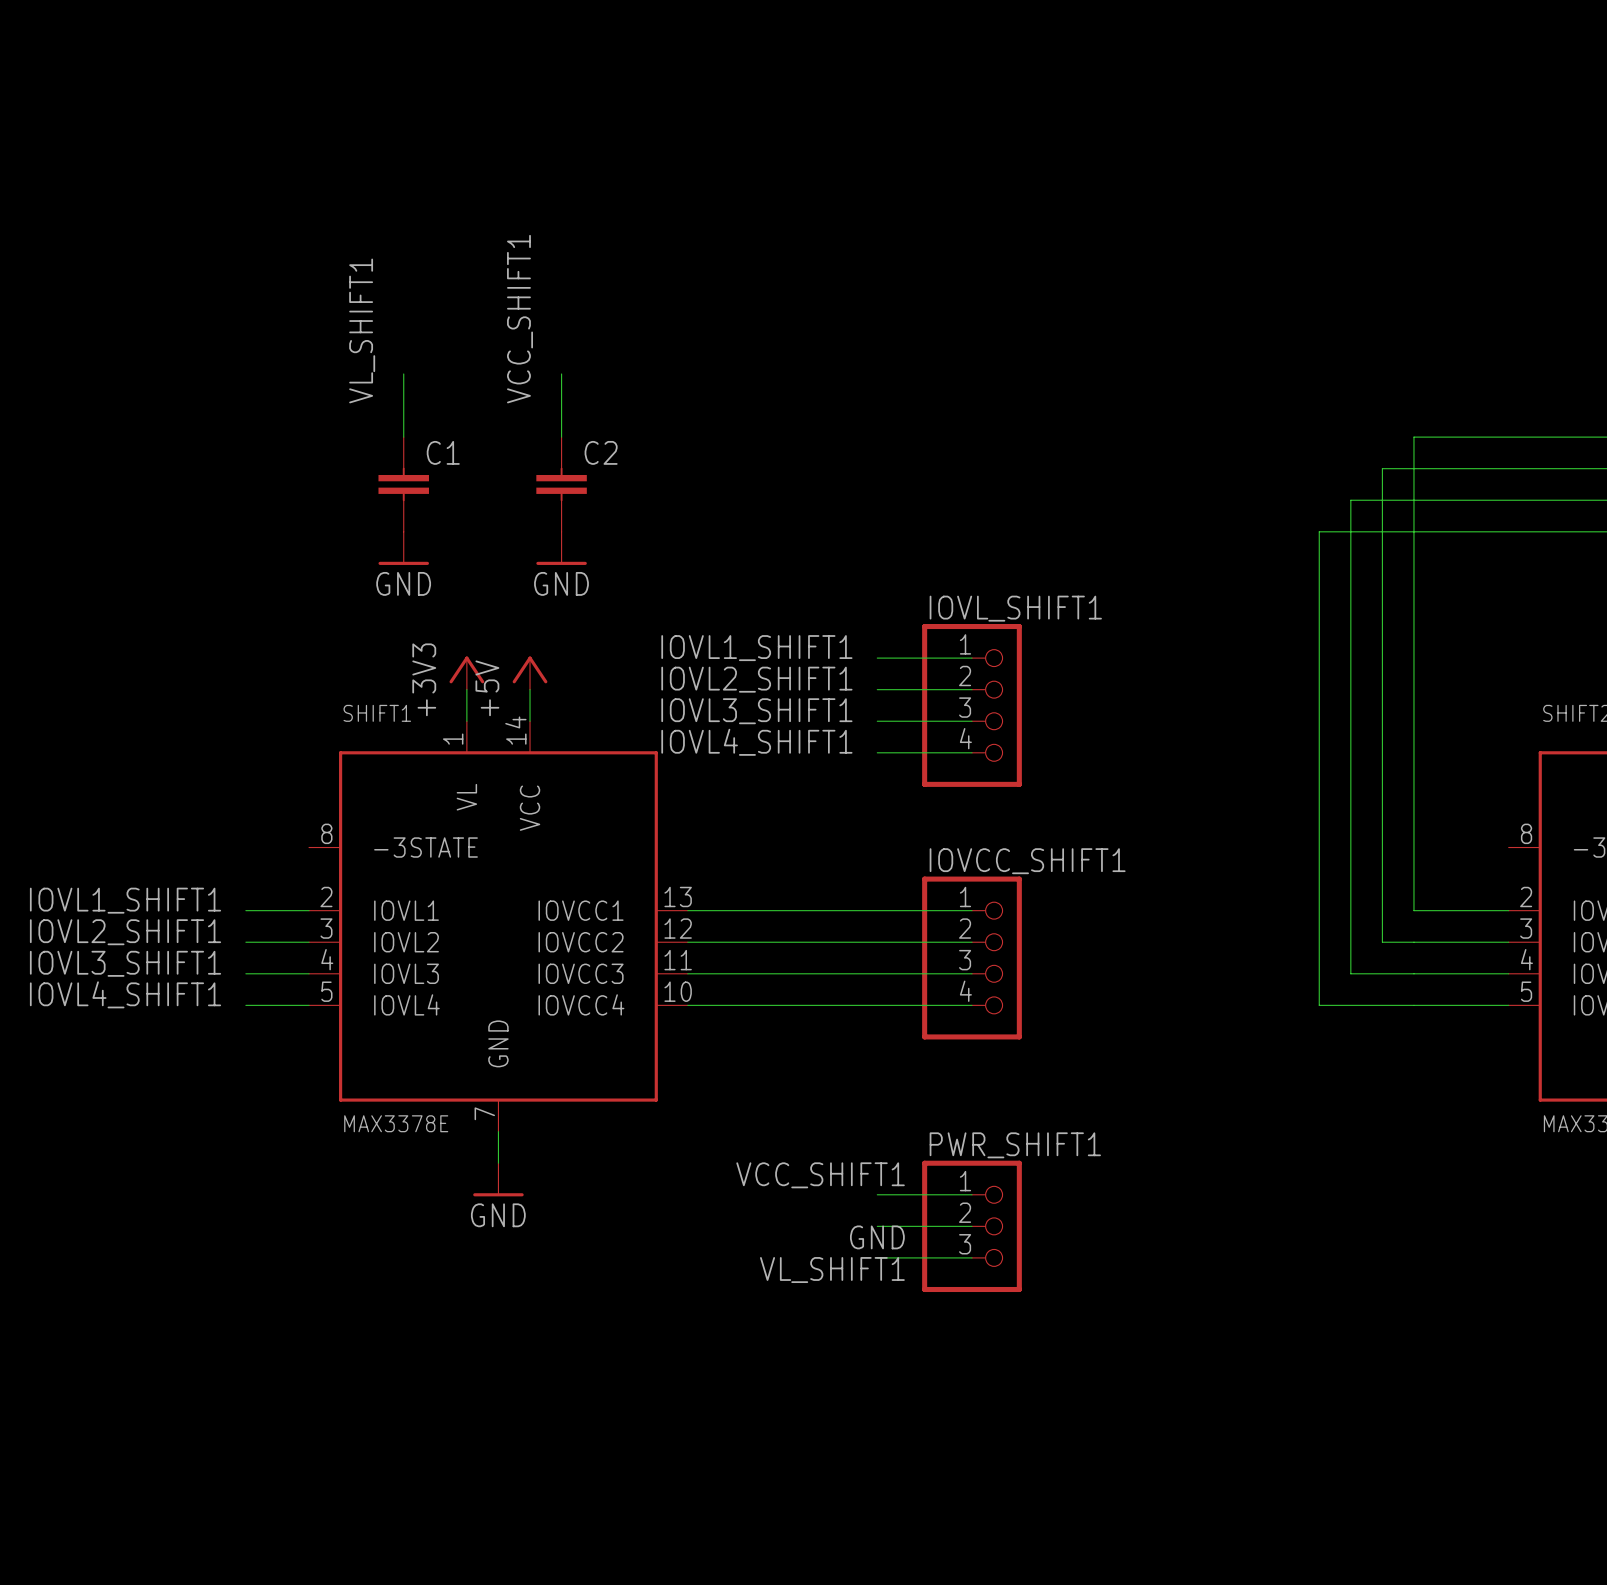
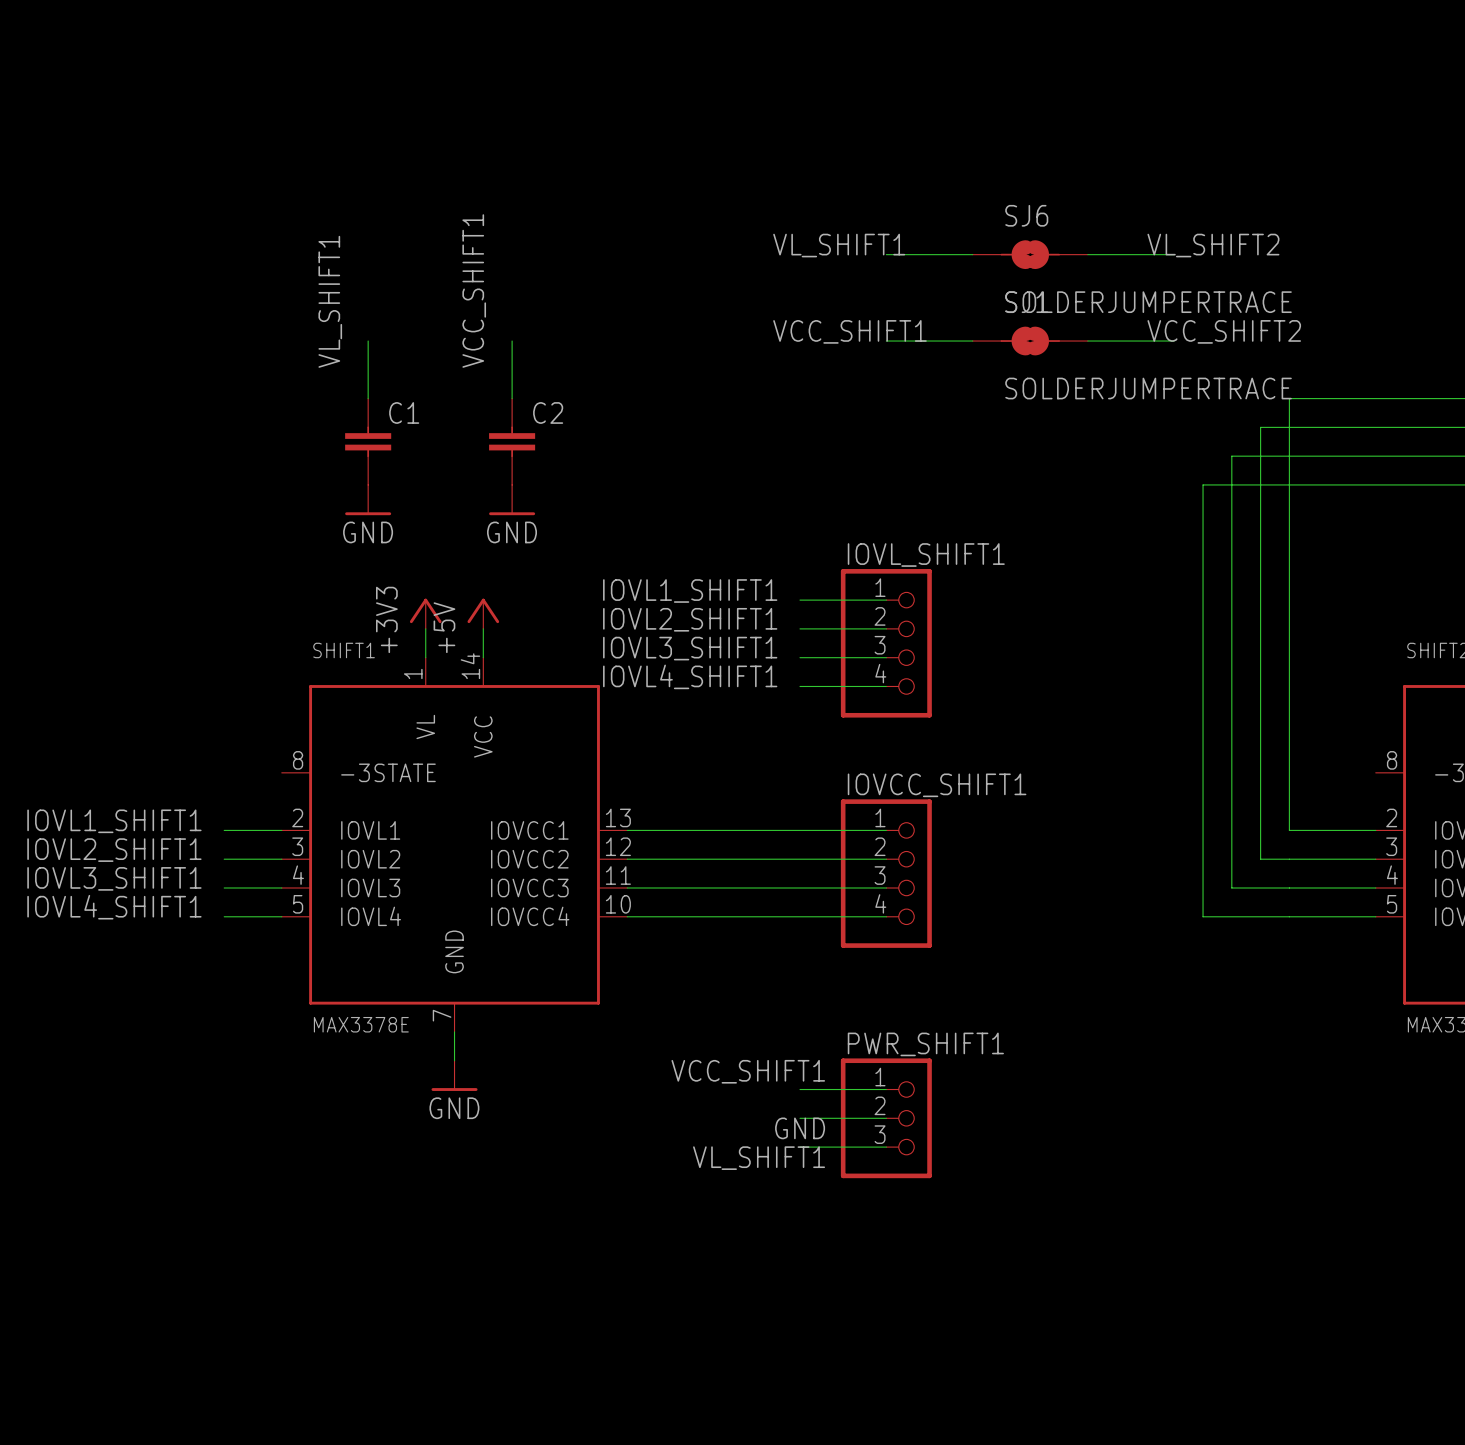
label: none -> VL_SHIFT1 (839, 245)
label: none -> VL_SHIFT2 (1213, 245)
wire: none -> (886, 254) (972, 254)
SJ6: none -> SOLDERJUMPERTRACE (1030, 254)
wire: none -> (1087, 254) (1174, 254)
label: none -> VCC_SHIFT1 (849, 331)
label: none -> VCC_SHIFT2 (1224, 331)
wire: none -> (886, 341) (972, 341)
part: none -> SOLDERJUMPERTRACE (1030, 341)
wire: none -> (1087, 341) (1174, 341)

